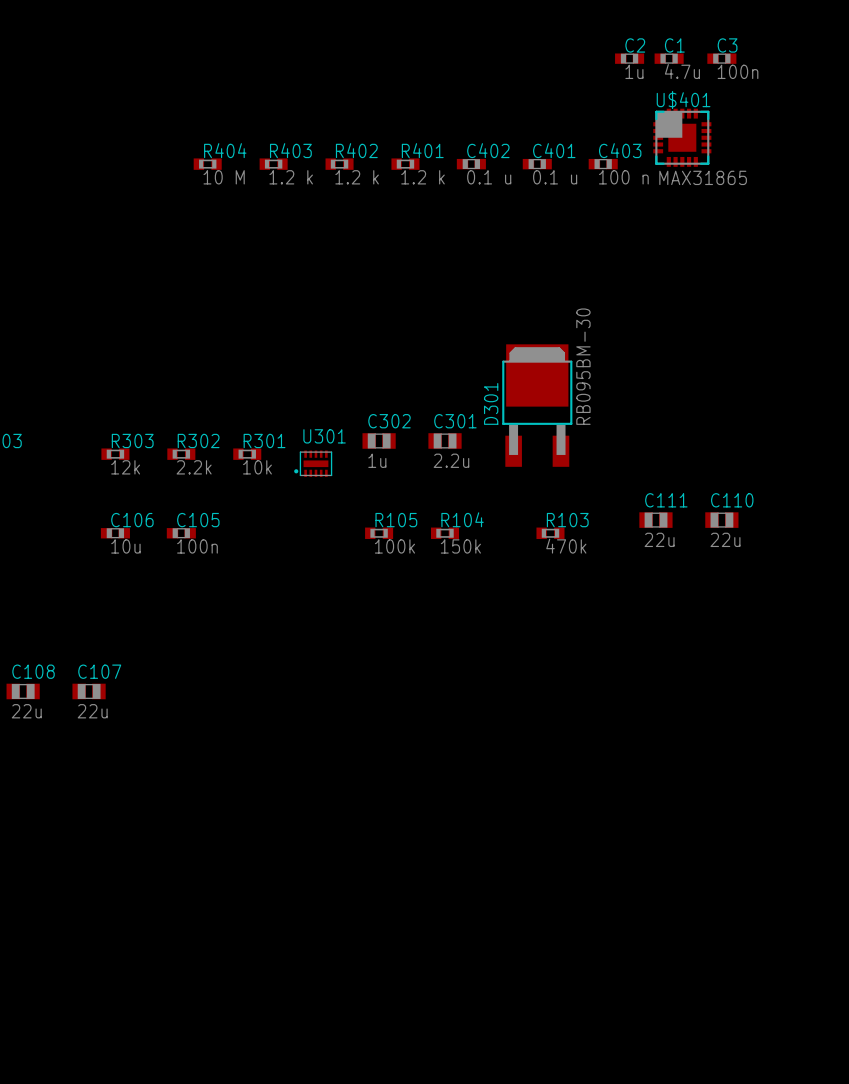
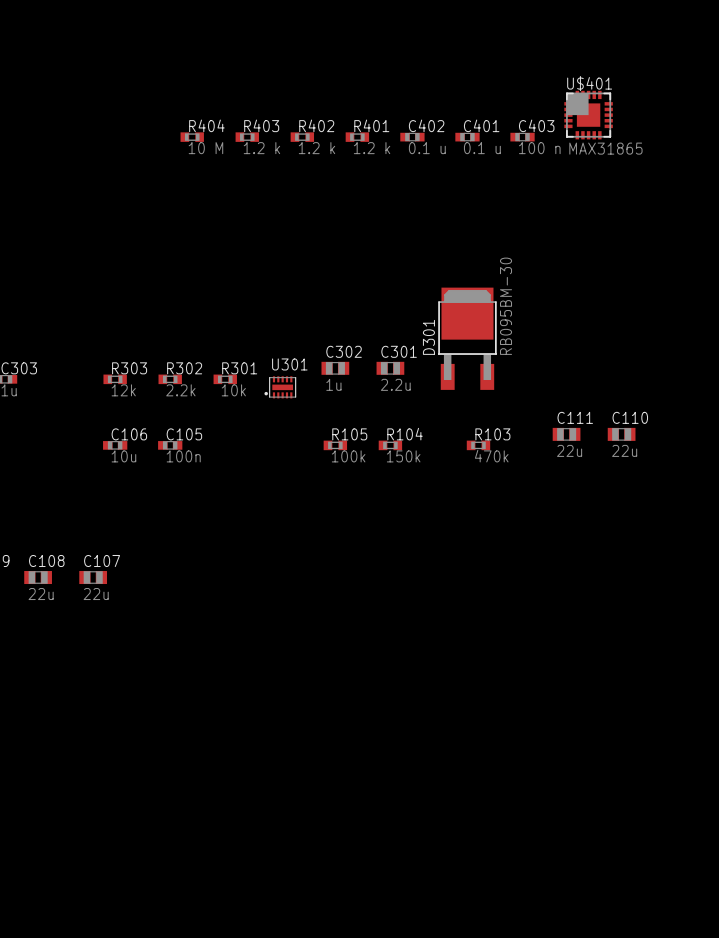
C2: 1u (629, 58) -> none
C1: 4.7u (669, 58) -> none
C3: 100n (721, 58) -> none

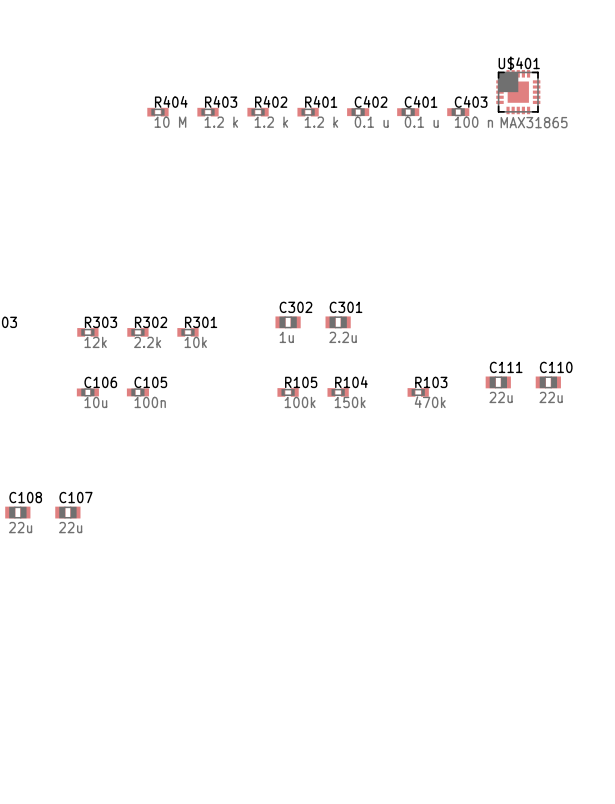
D301: RB095BM-30 (467, 338) -> none
U301: (280, 387) -> none

